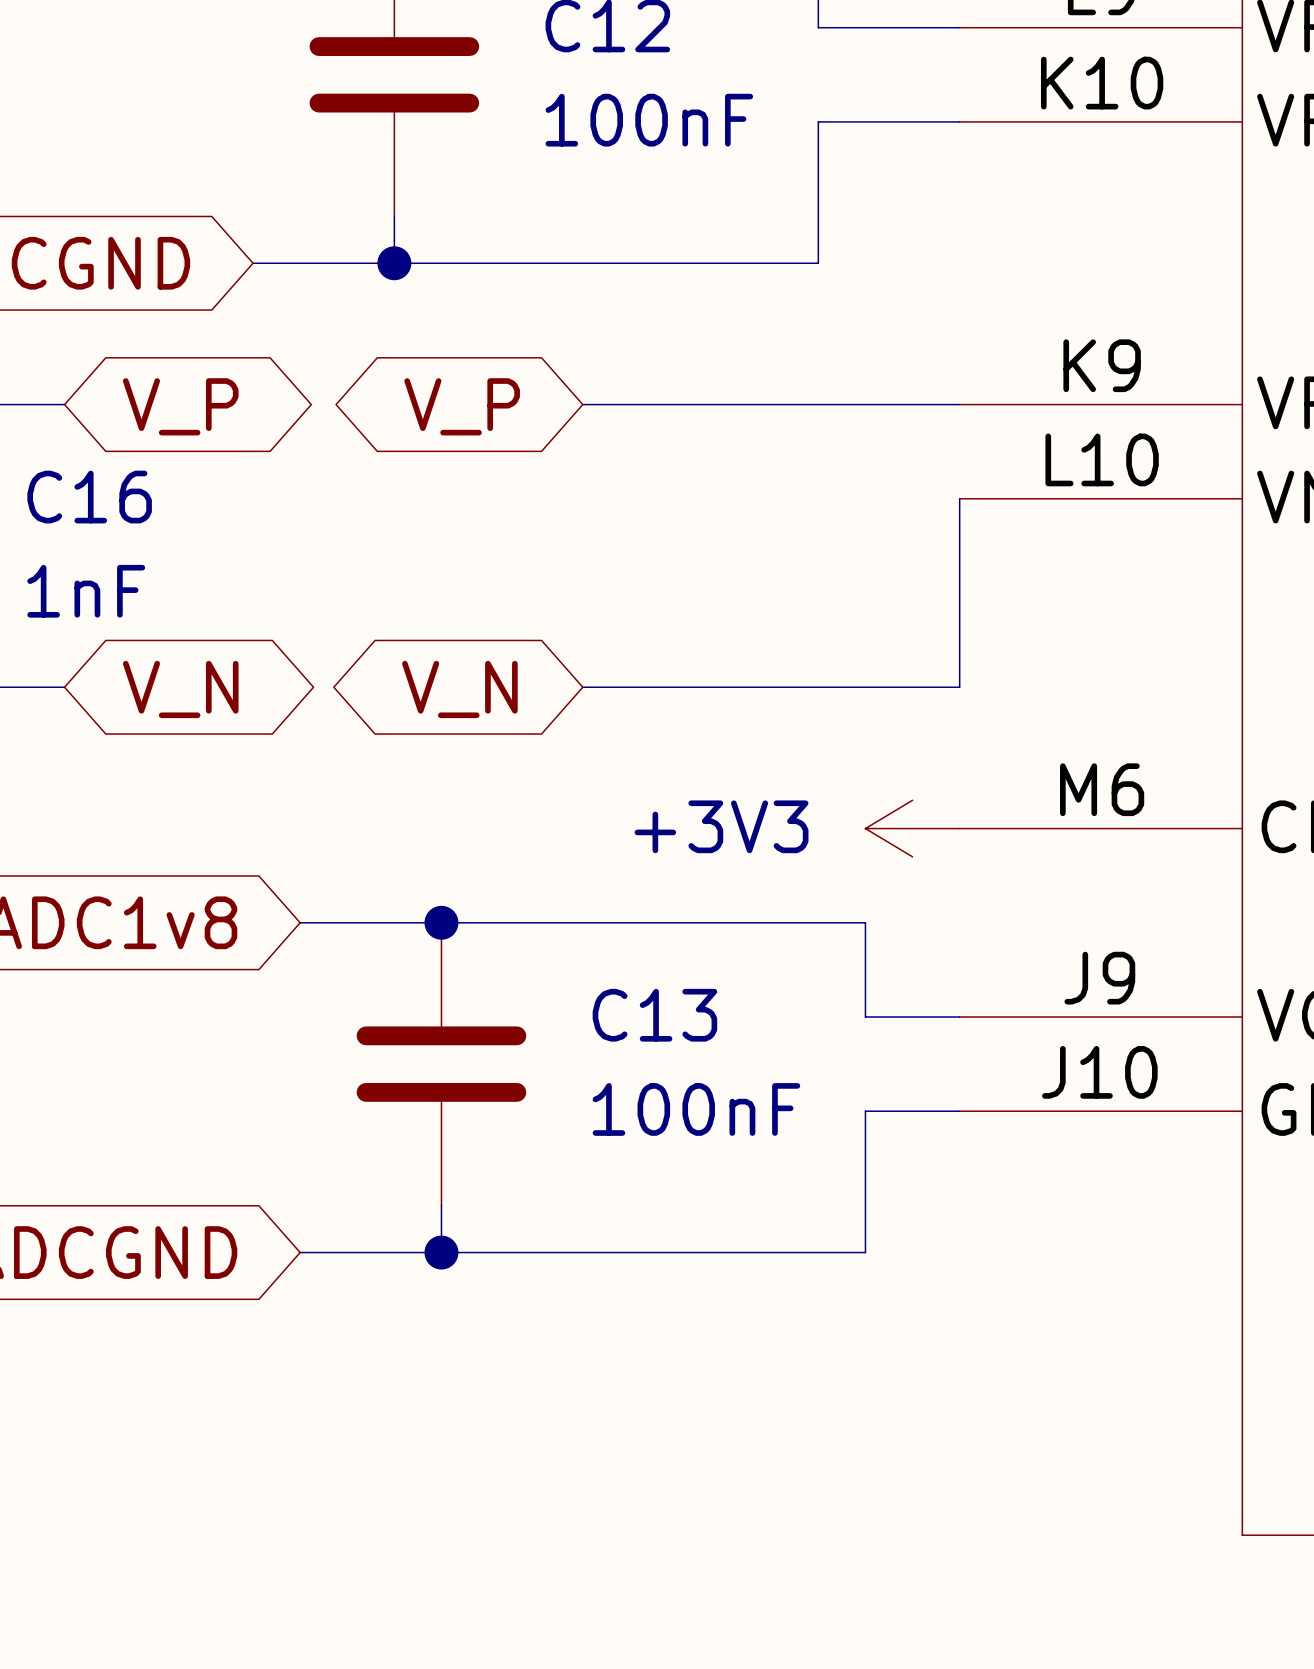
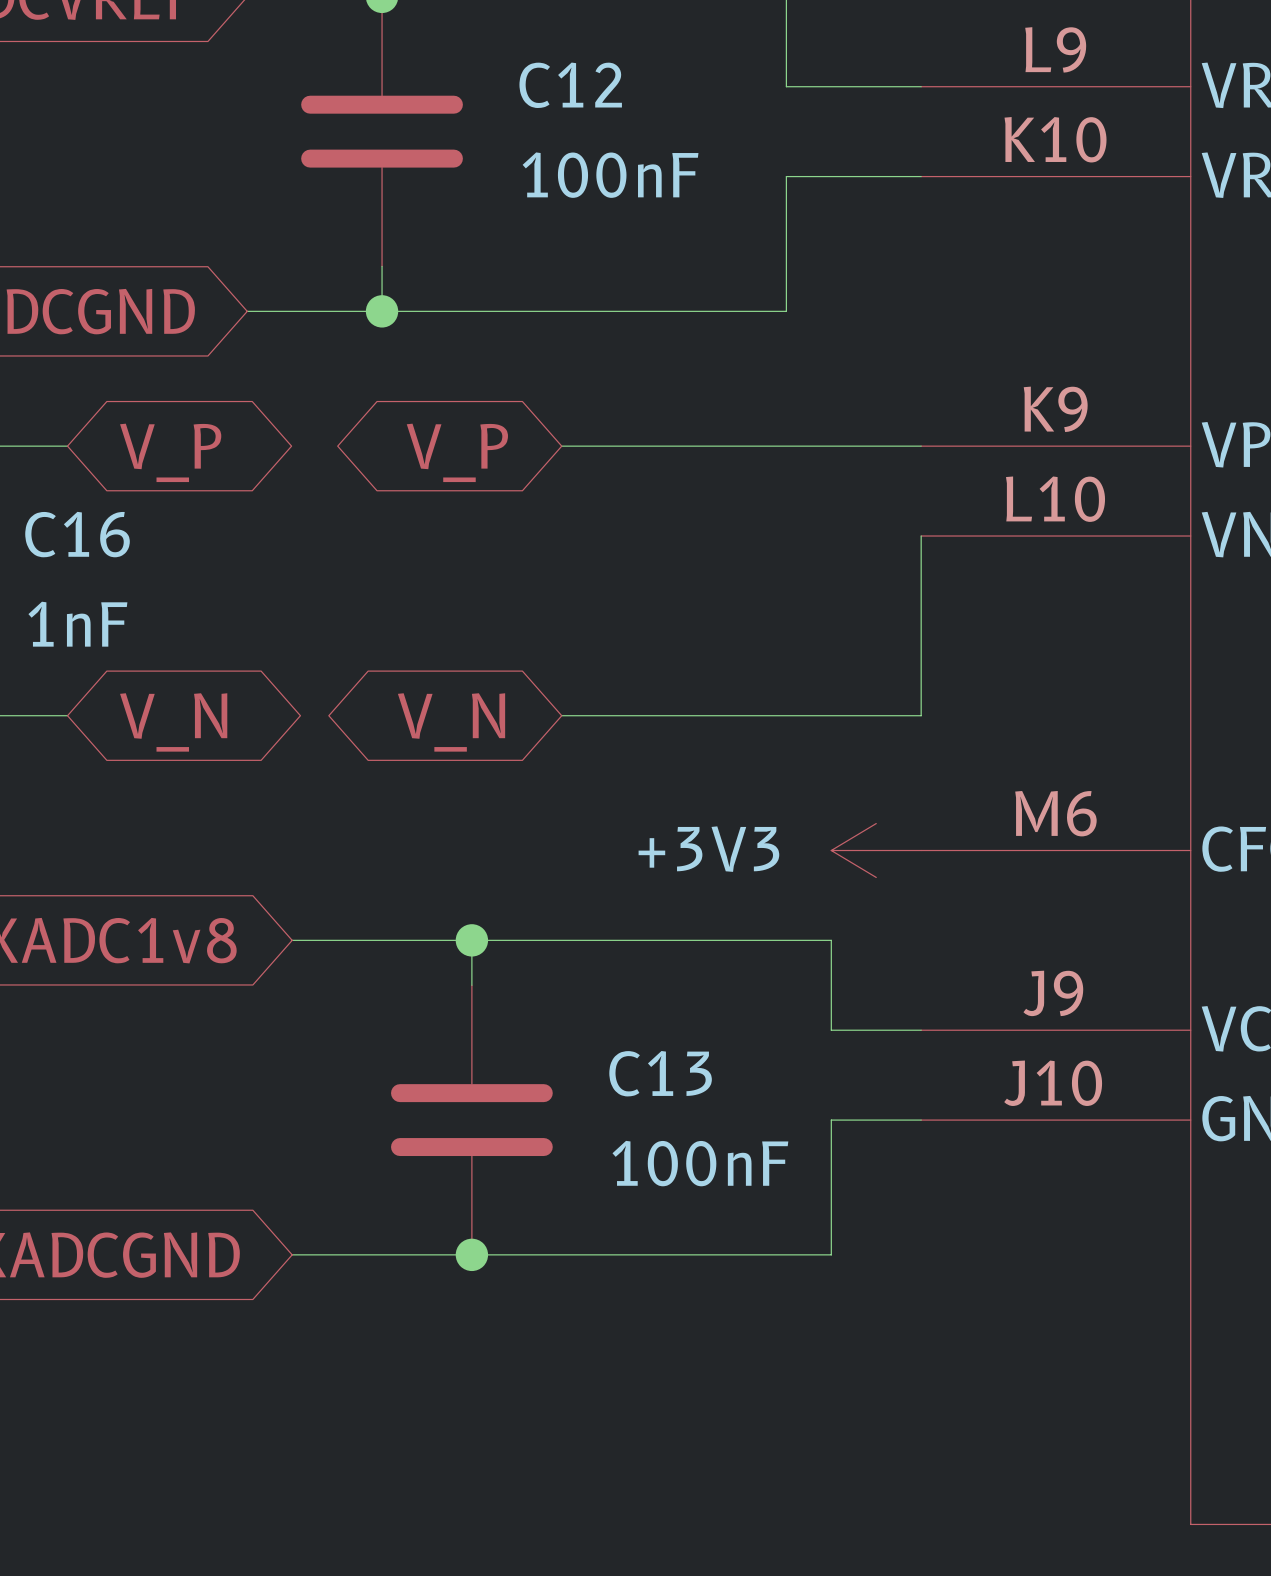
junction position: (441, 922) -> (471, 940)
C13 position: (441, 1064) -> (471, 1120)
wire: (441, 1205) (441, 1252) -> (471, 940) (471, 985)
junction position: (441, 1252) -> (471, 1254)

